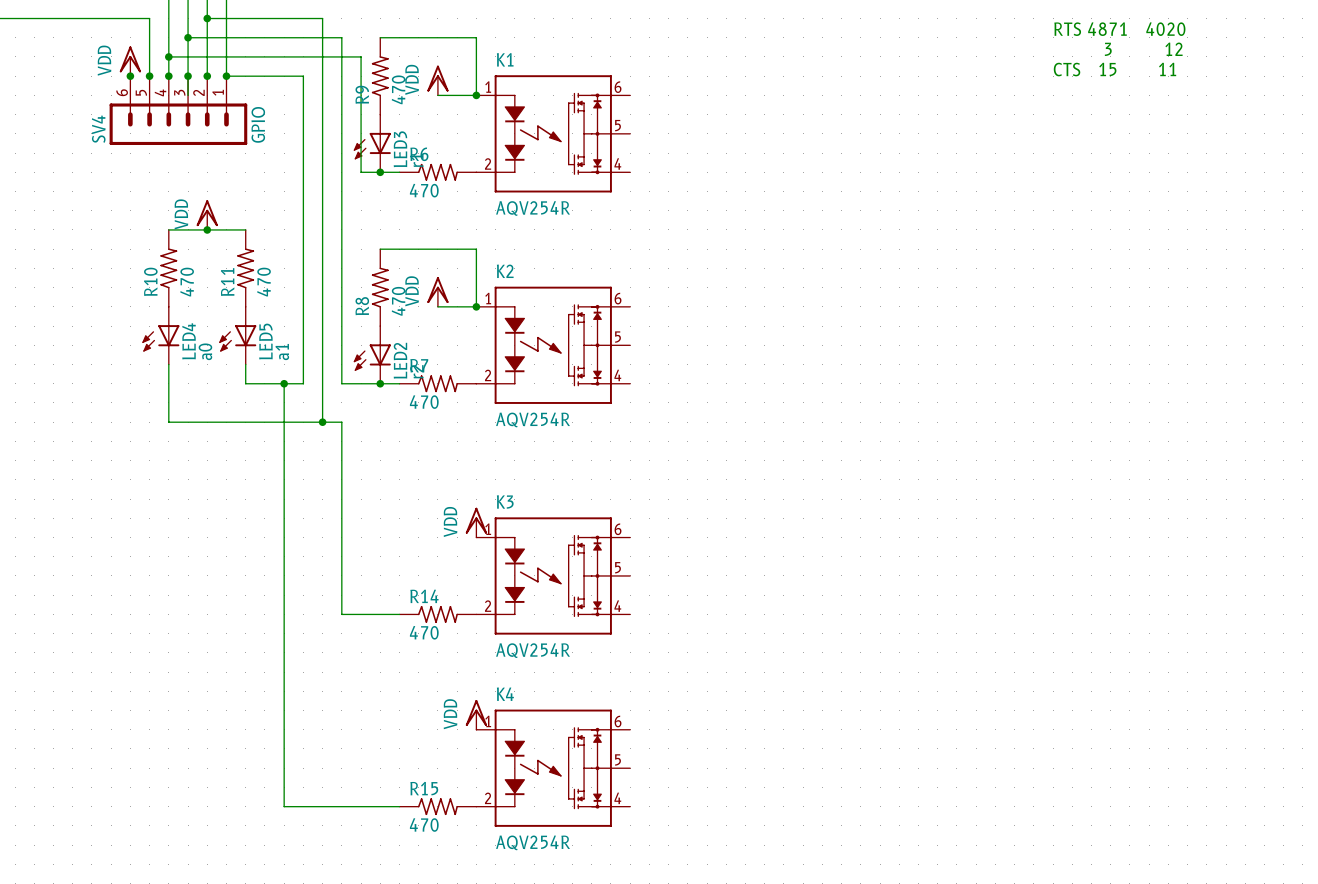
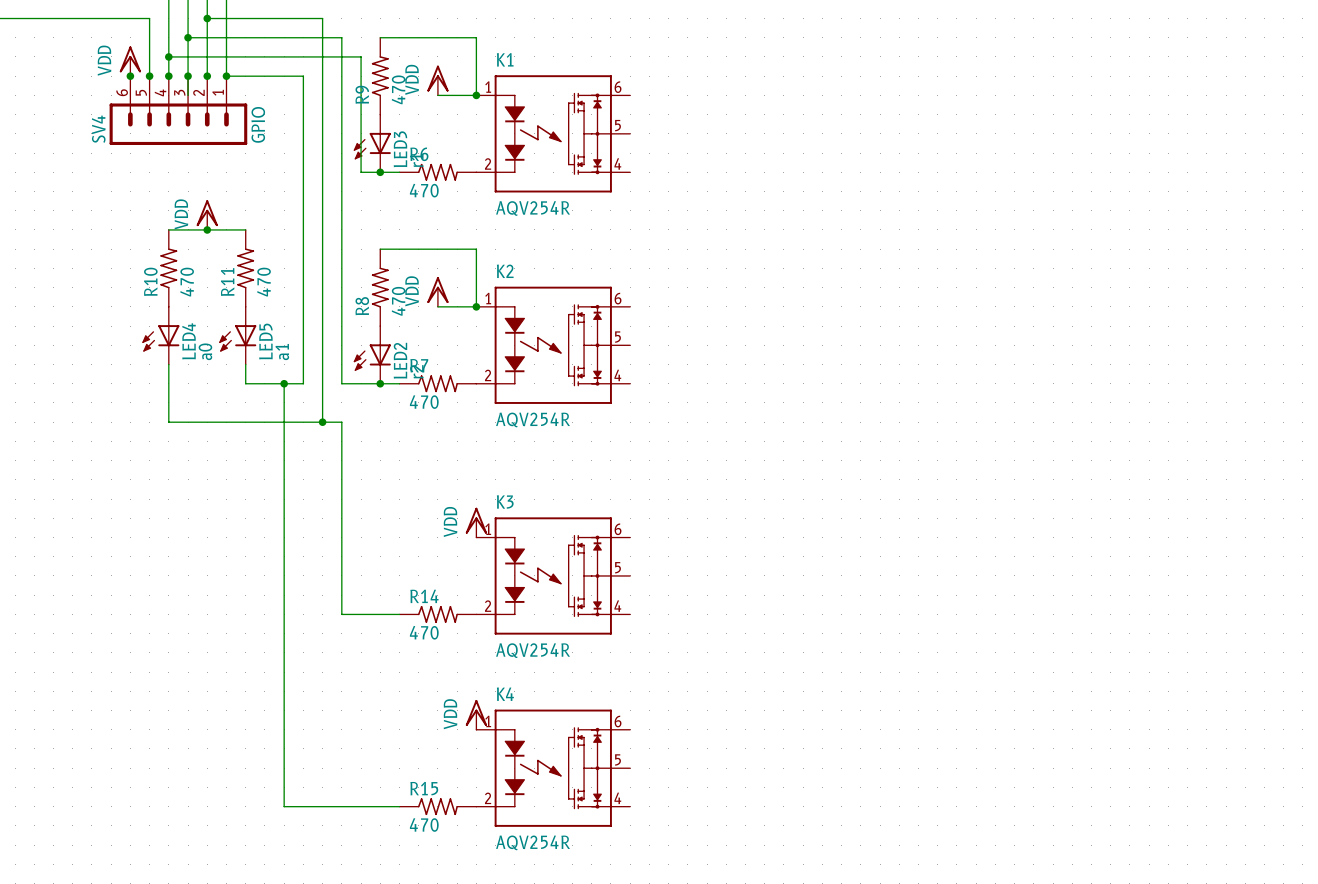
text: RTS 4871 4020 (1119, 29) -> none
text: 3 12 (1143, 49) -> none
text: CTS 15 11 (1114, 69) -> none

